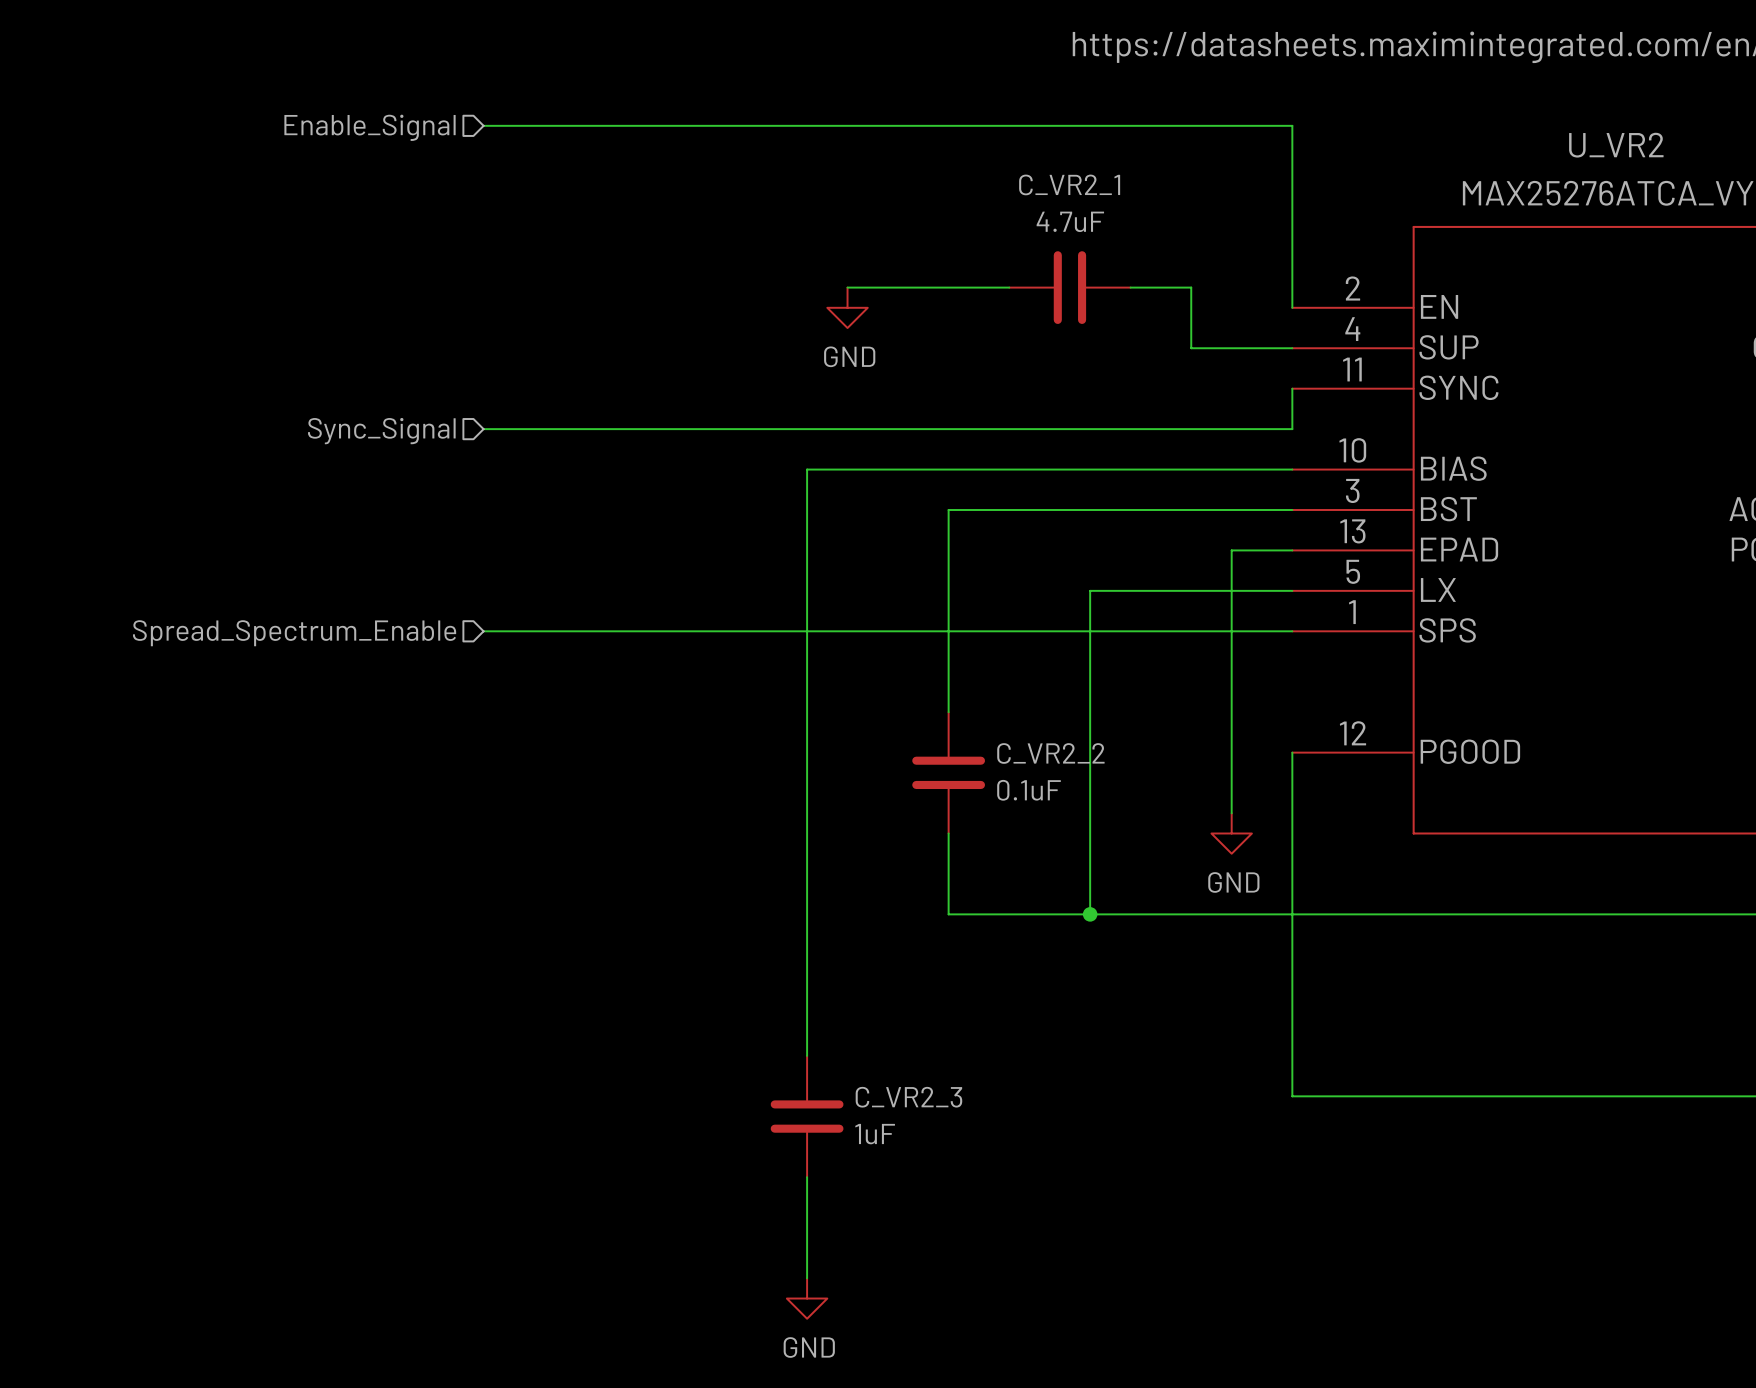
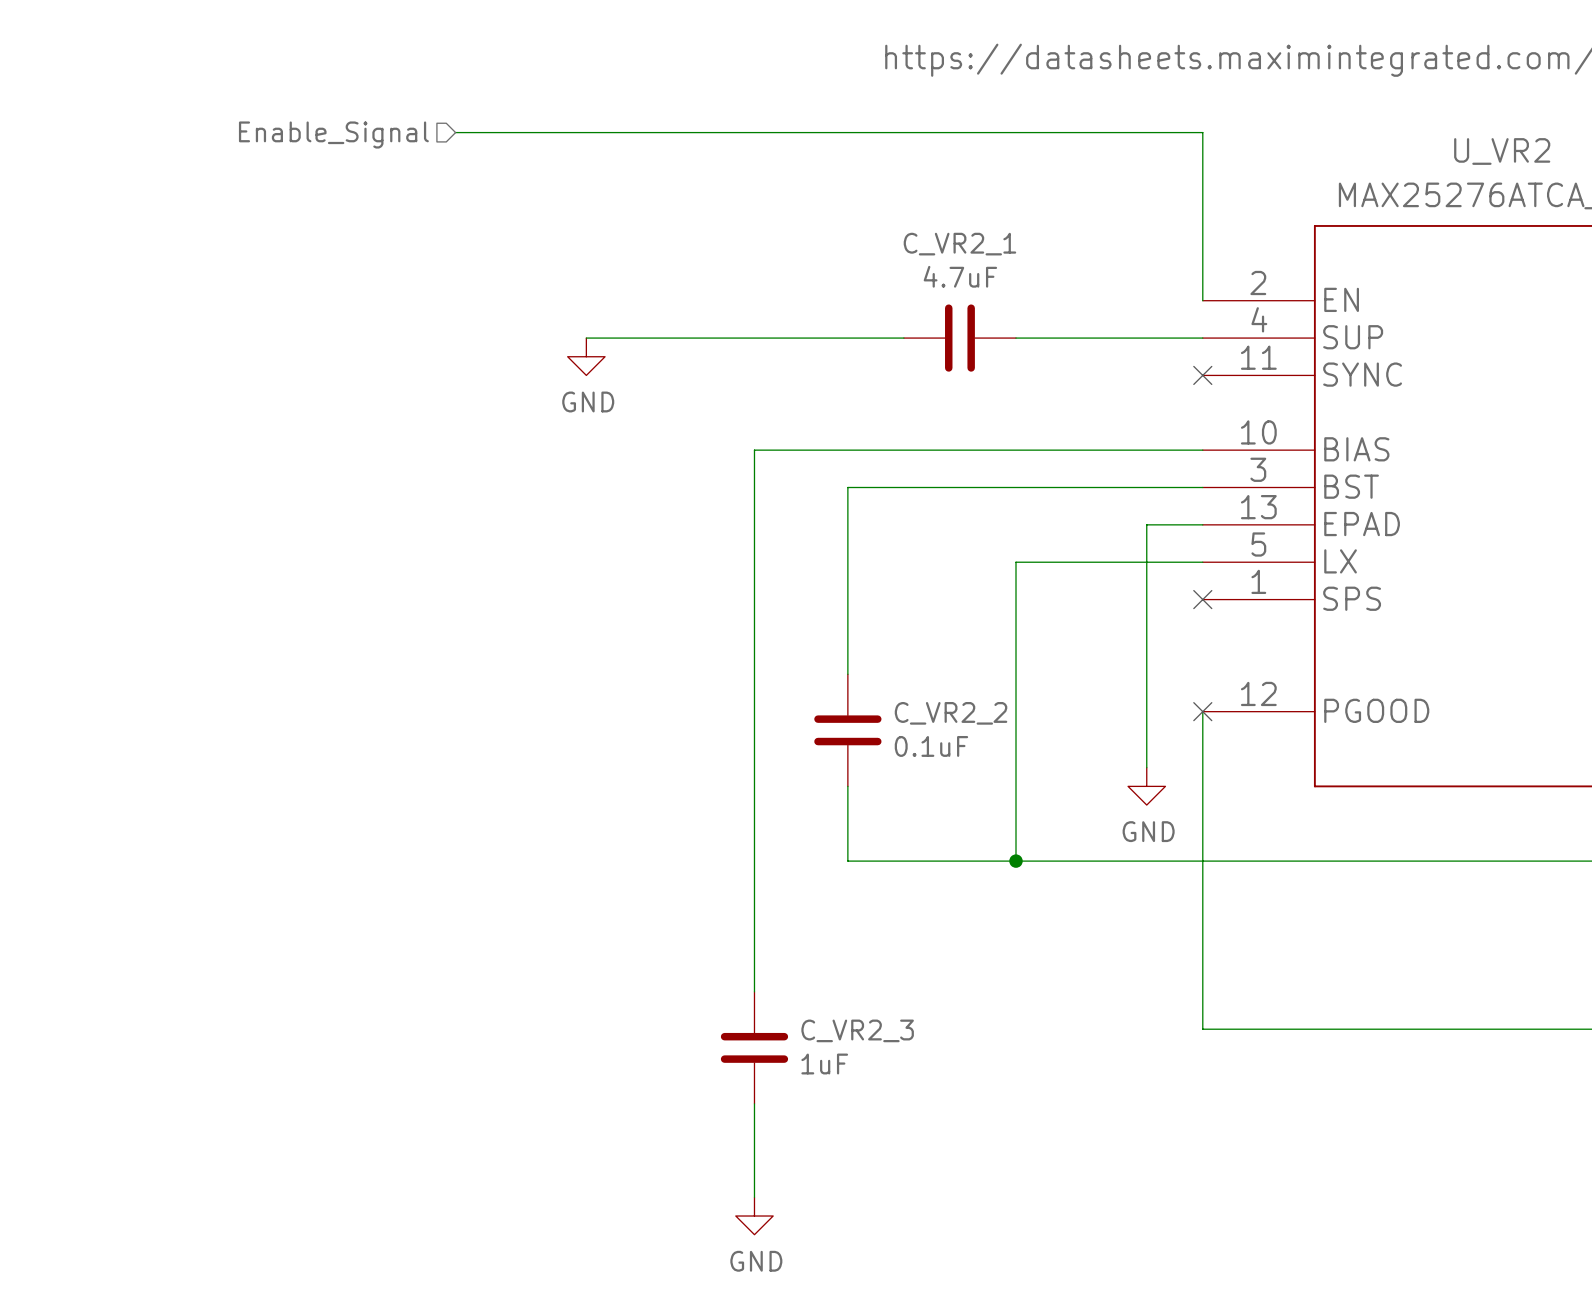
wire: (847, 287) (1009, 287) -> none
C_VR2_1 position: (1069, 287) -> (959, 338)
wire: (1130, 287) (1191, 287) (1191, 348) -> (1016, 338) (1109, 338)
power symbol position: GND (847, 307) -> GND (586, 356)
wire: none -> (586, 338) (903, 338)
wire: (1292, 388) (1292, 429) (483, 429) -> none
no-connect mark: none -> (1202, 375)
hierarchical label: Sync_Signal (381, 431) -> none
wire: (948, 509) (948, 712) -> (885, 487) (847, 487) (847, 674)
wire: (483, 631) (1292, 631) -> none
no-connect mark: none -> (1202, 599)
hierarchical label: Spread_Spectrum_Enable (294, 633) -> none
no-connect mark: none -> (1202, 711)
C_VR2_2 position: (948, 772) -> (847, 730)
wire: (948, 833) (948, 914) -> (847, 786) (847, 861) (885, 861)

